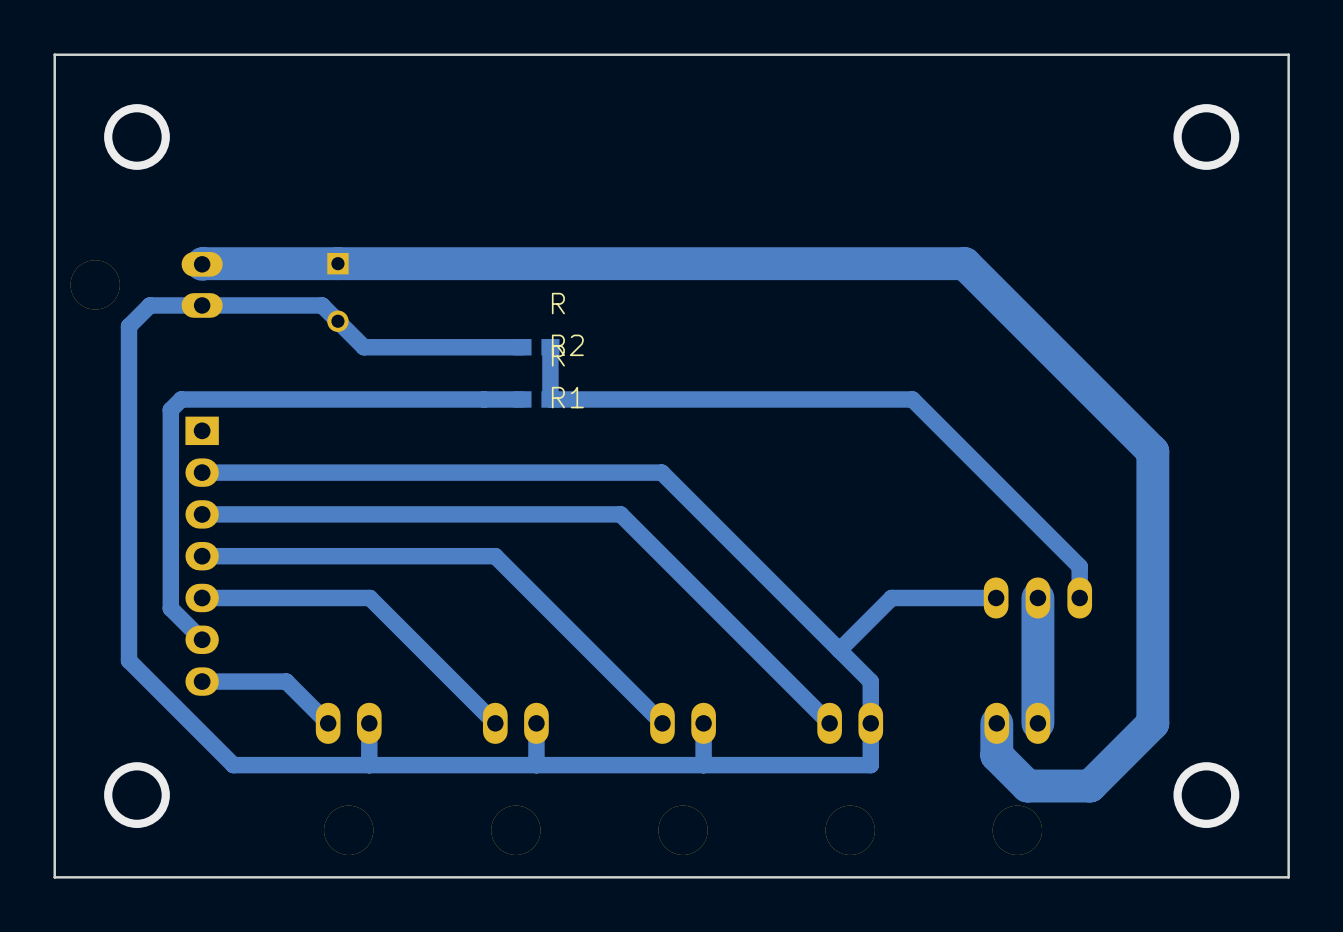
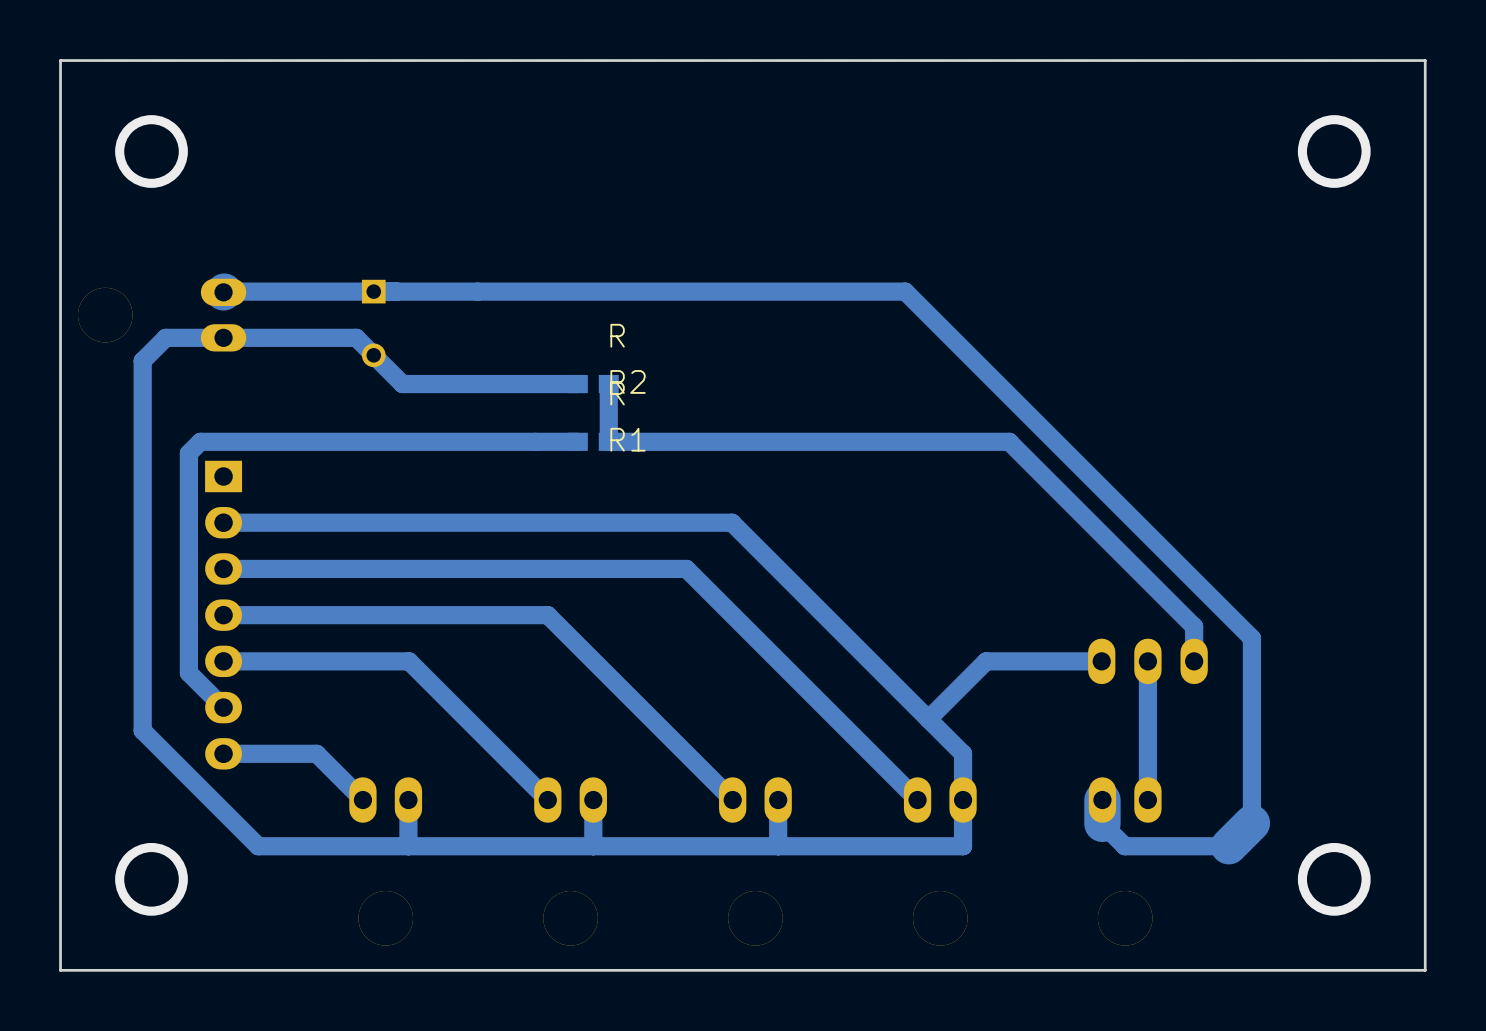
track: (818, 263) (964, 263) (1152, 451) (1152, 723) (1131, 744) -> (905, 291) (1251, 638) (1251, 823)
track width: thick (818, 263) (202, 263) -> thin (905, 291) (224, 291)
track width: thick (1037, 597) (1037, 723) -> thin (1147, 661) (1147, 800)
track: (996, 744) (996, 755) (1027, 786) (1090, 786) (1111, 765) -> (1102, 823) (1124, 846) (1228, 846)

